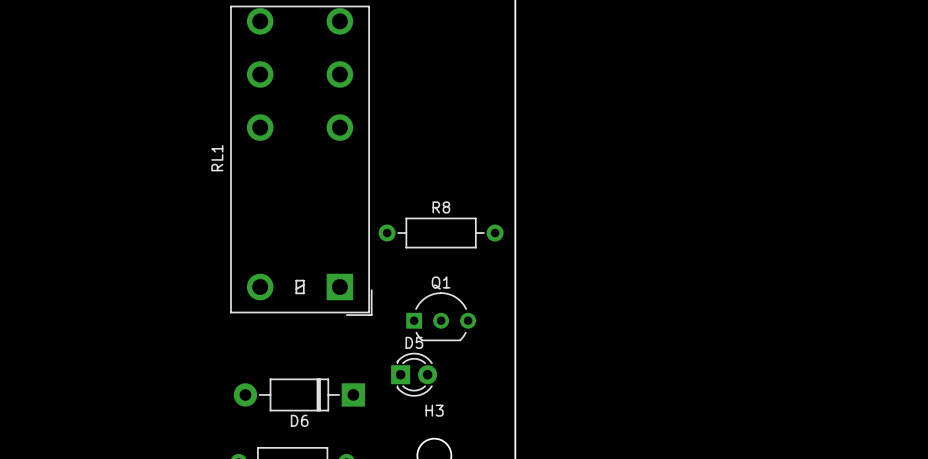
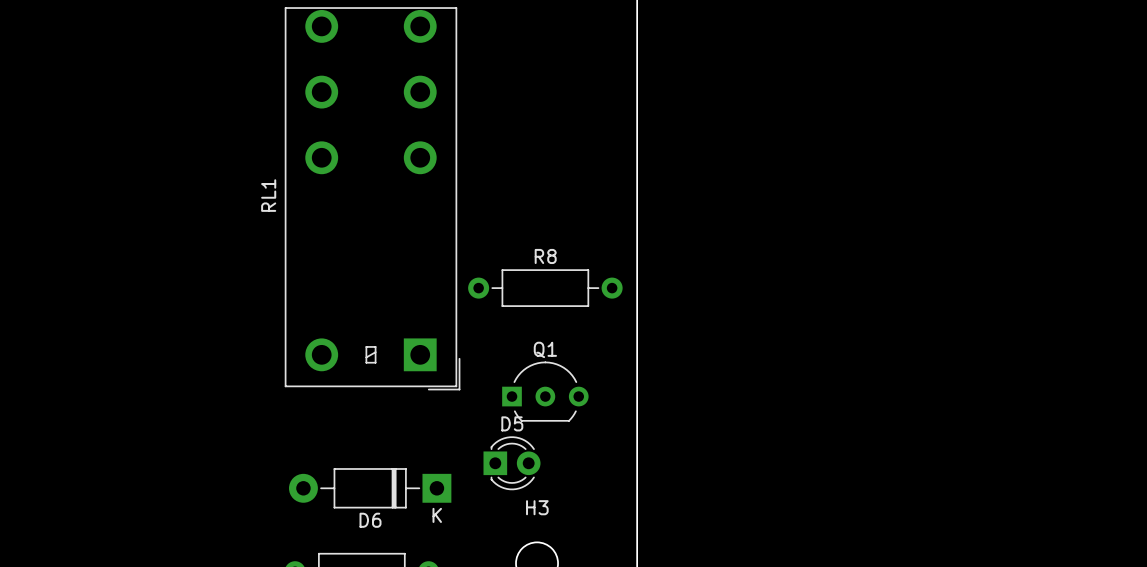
D6 text: none -> K (437, 515)

